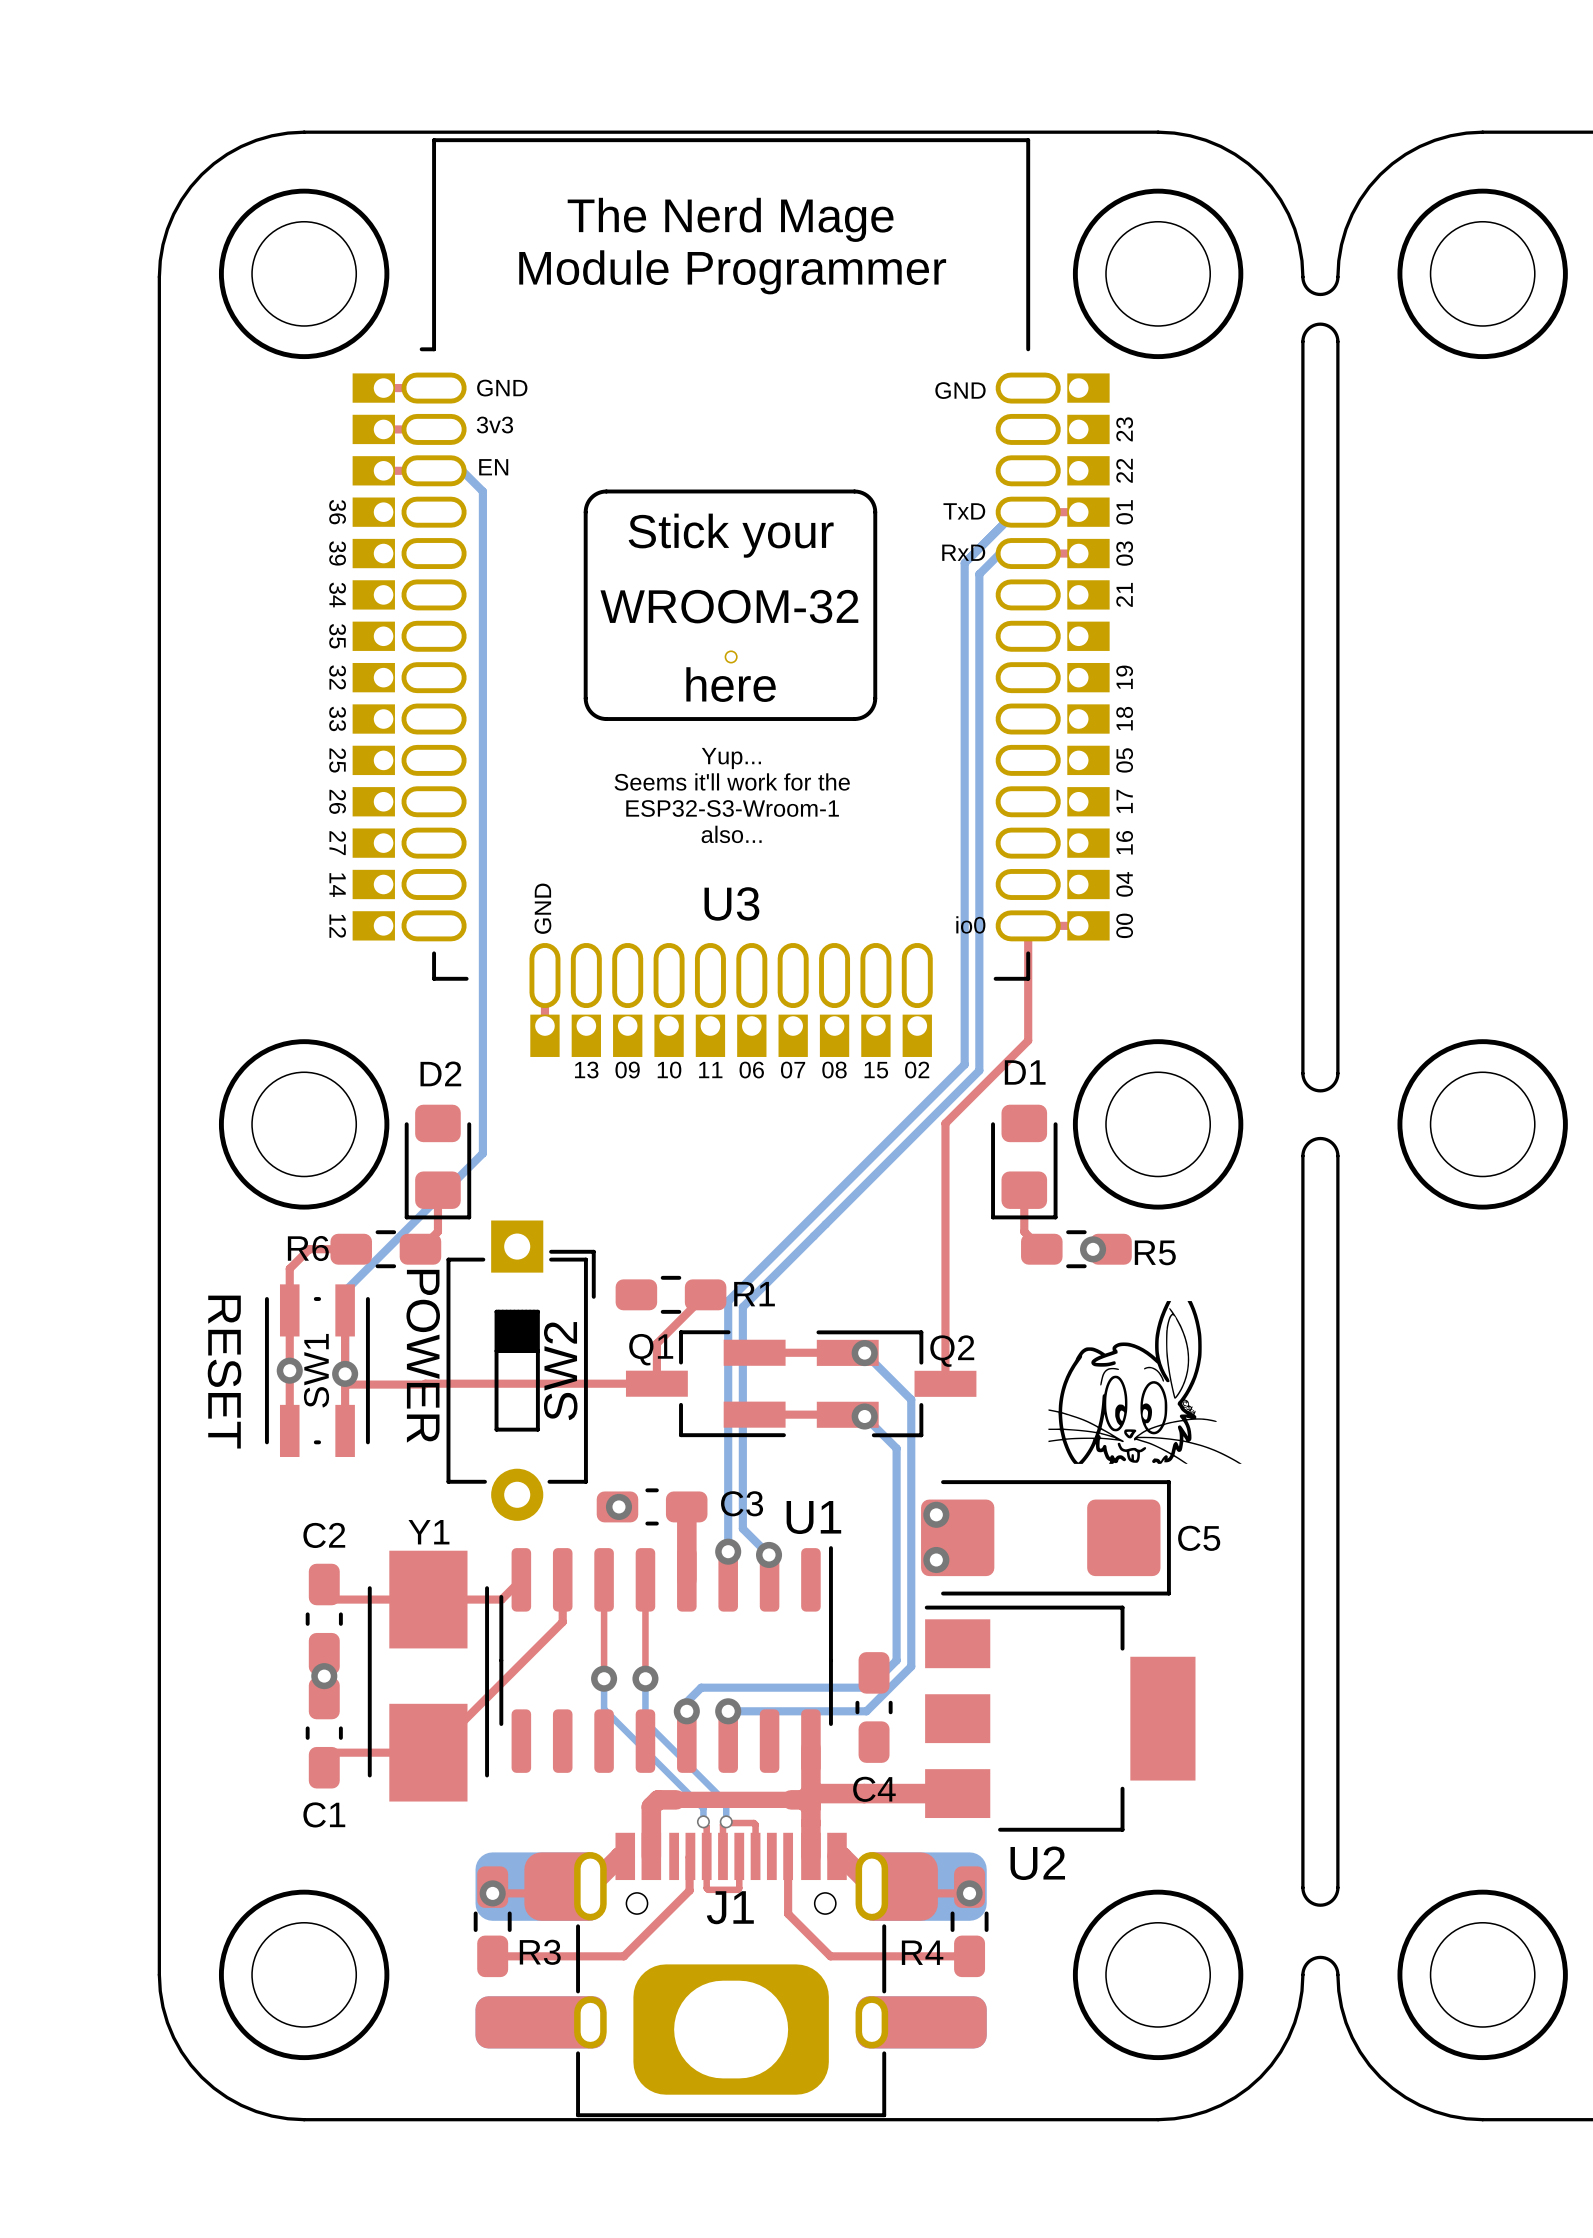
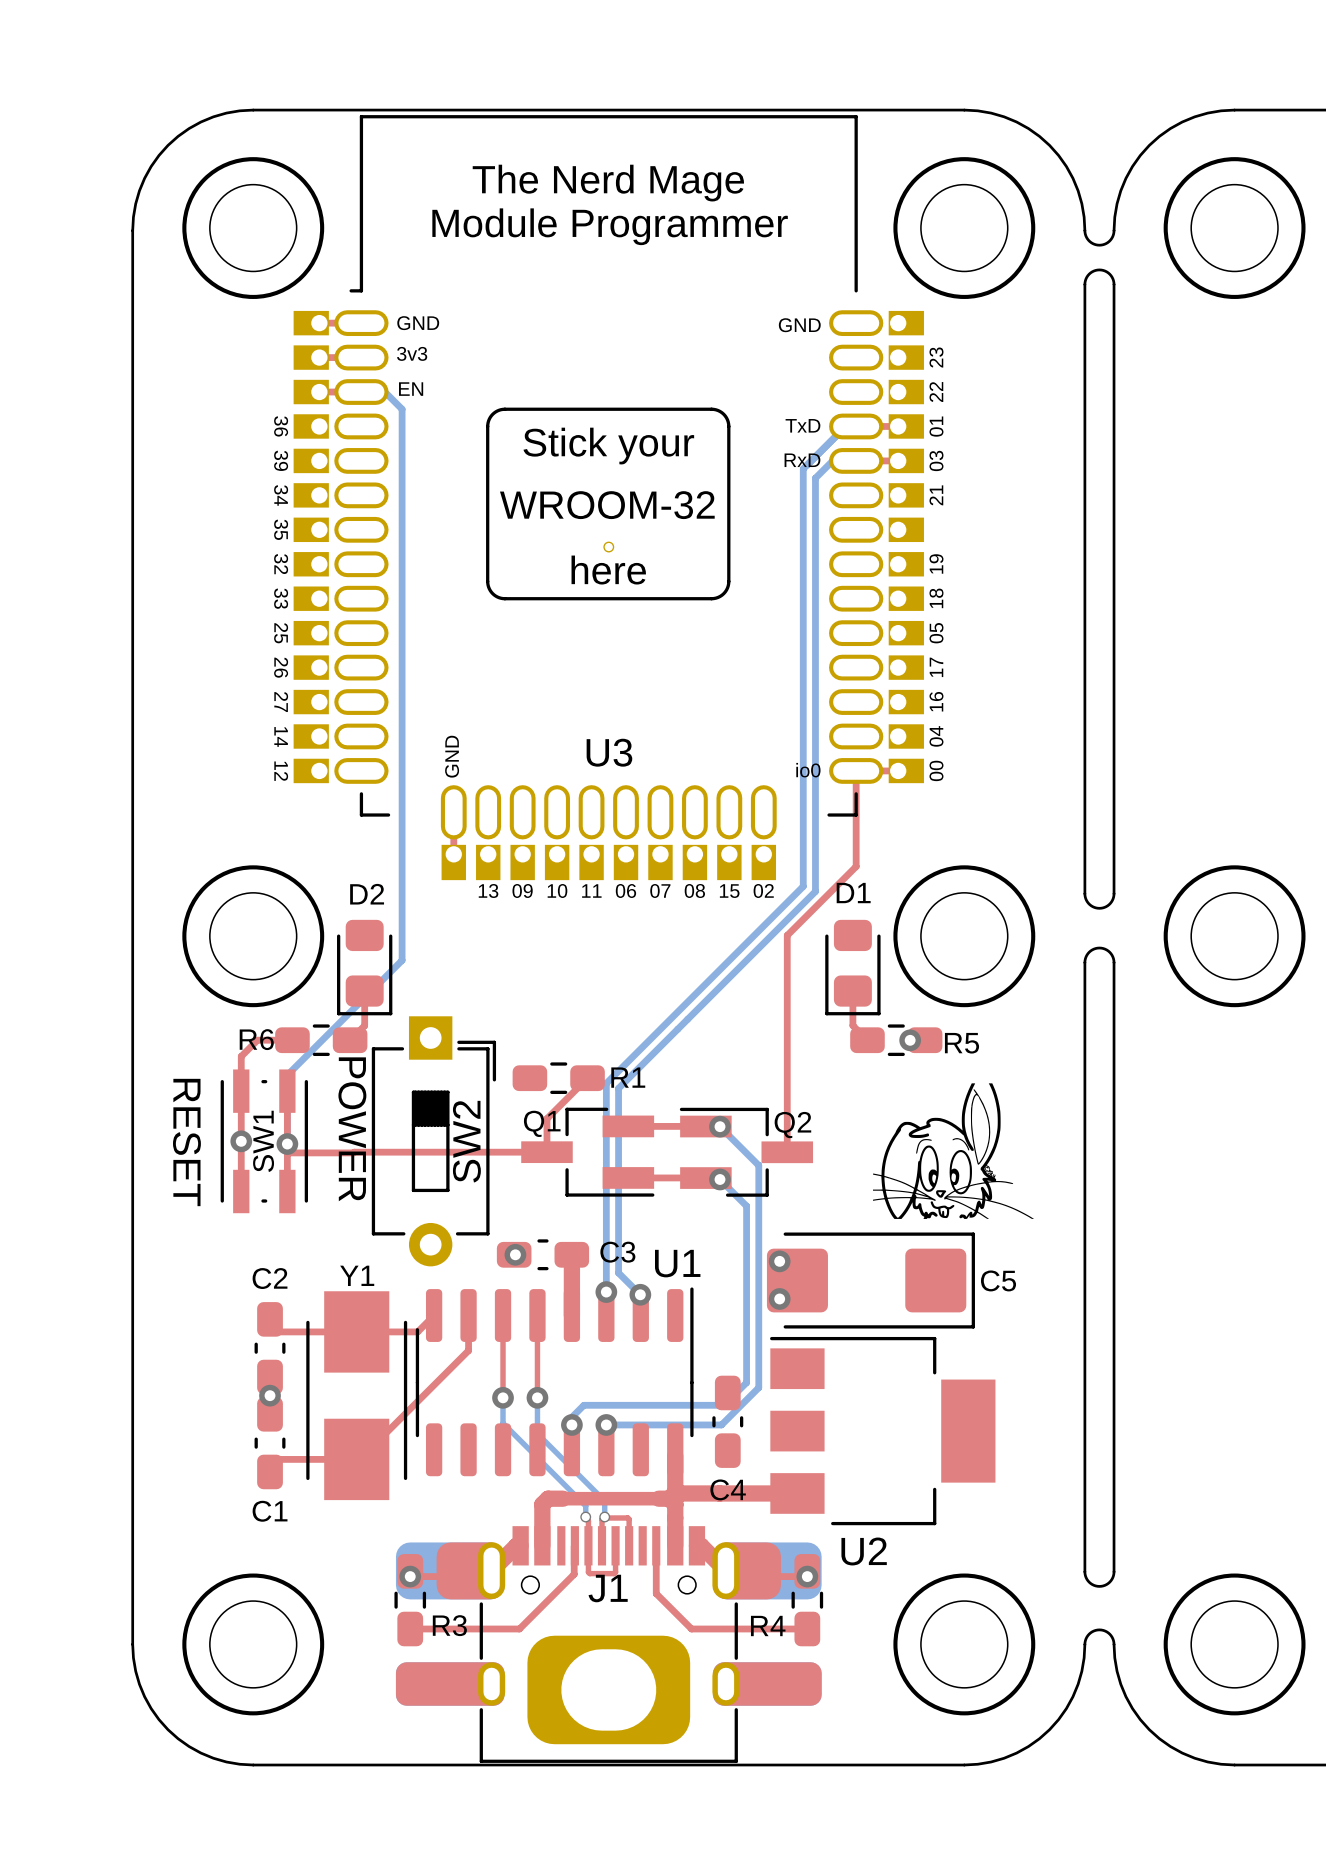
text: Yup... (731, 758) -> none
text: Seems it'll work for the (732, 781) -> none
text: ESP32-S3-Wroom-1 (732, 808) -> none
text: also... (731, 834) -> none

